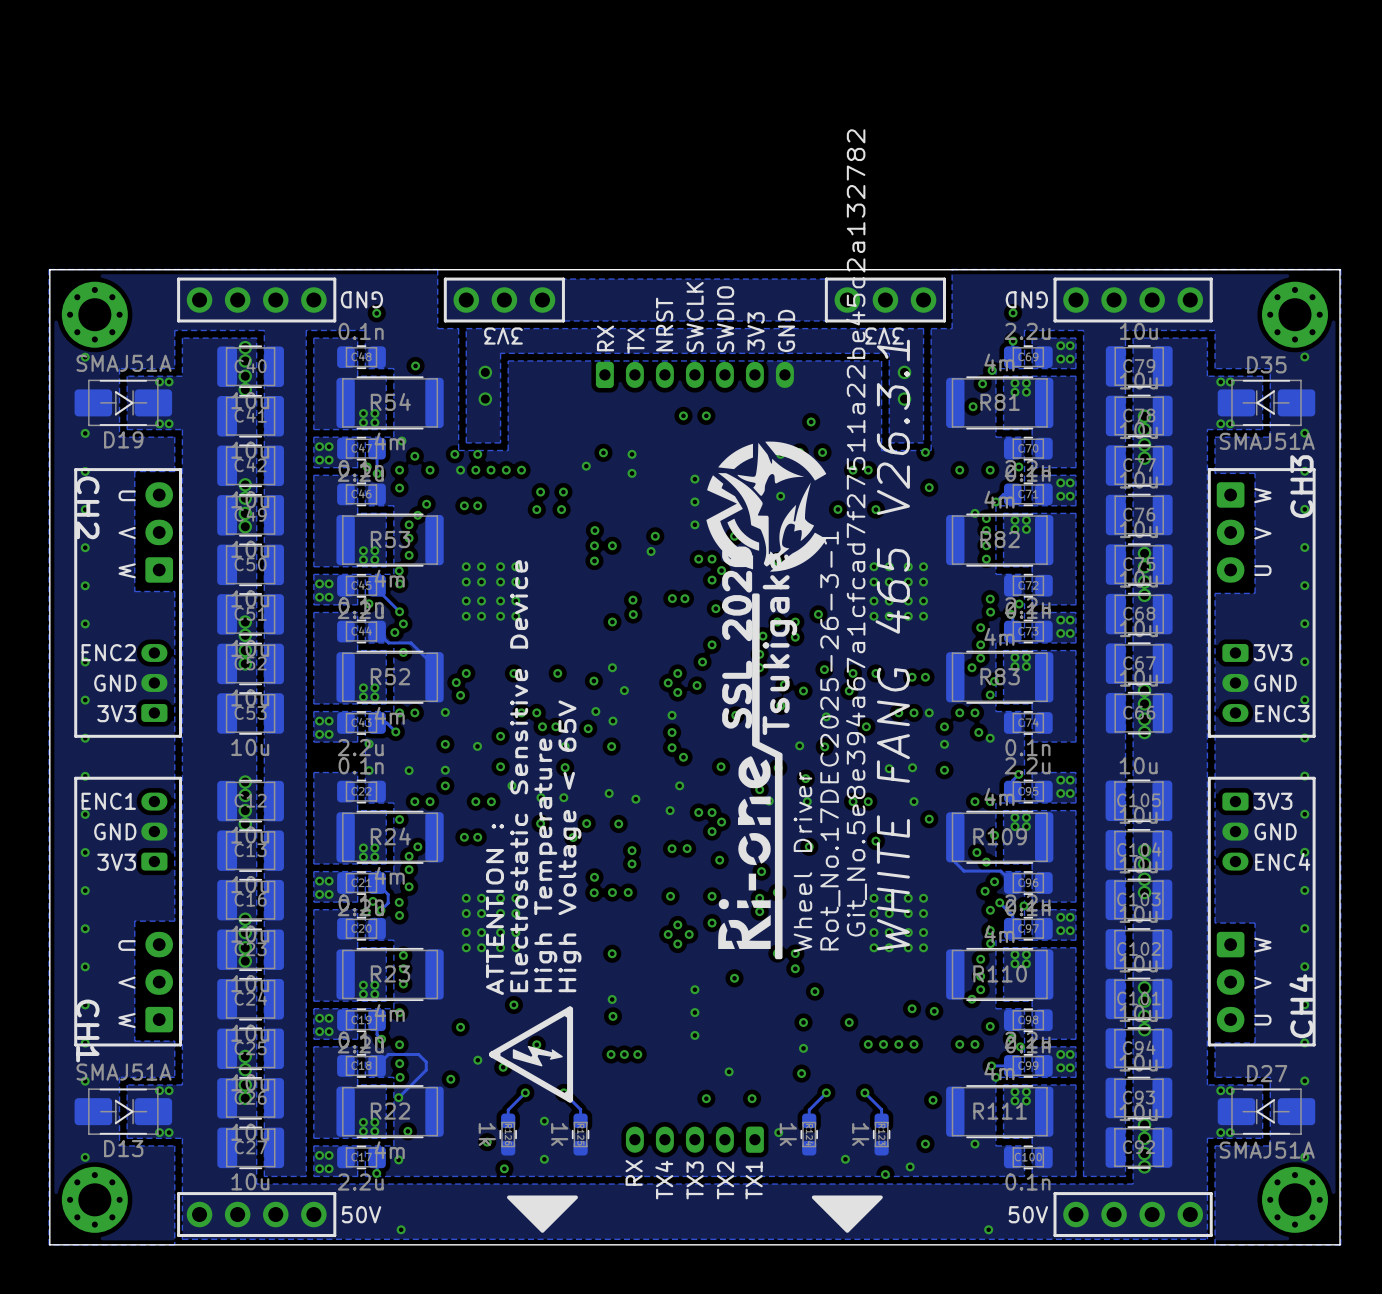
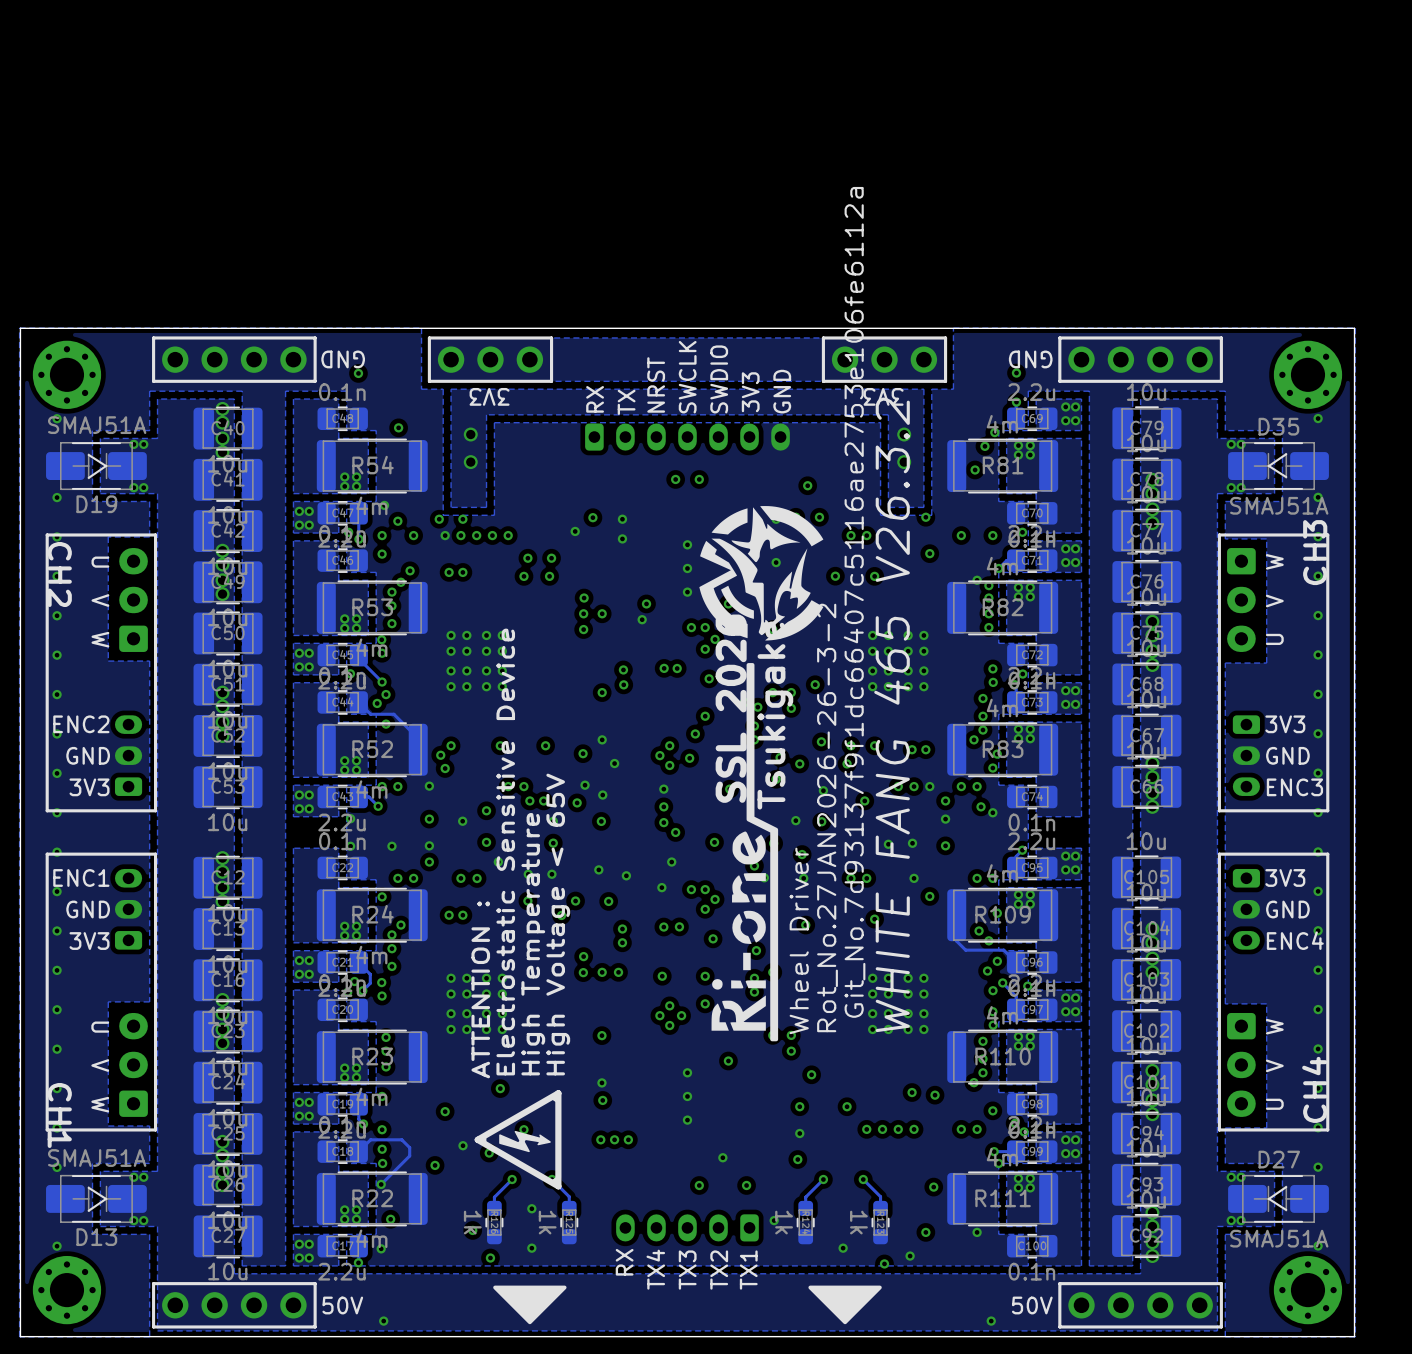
text: Git_No.5e8e394a67a1cfcad7f27511a22be45c2a132782 (856, 532) -> Git_No.7d93137f9f1dc66407c5116ae2753e106fe6112a (854, 602)
text: WHITE FANG 465 V26.3.1 (892, 644) -> WHITE FANG 465 V26.3.2 (892, 714)
text: Rot_No.17DEC2025-26-3-1 (830, 740) -> Rot_No.27JAN2026-26-3-2 (827, 817)

